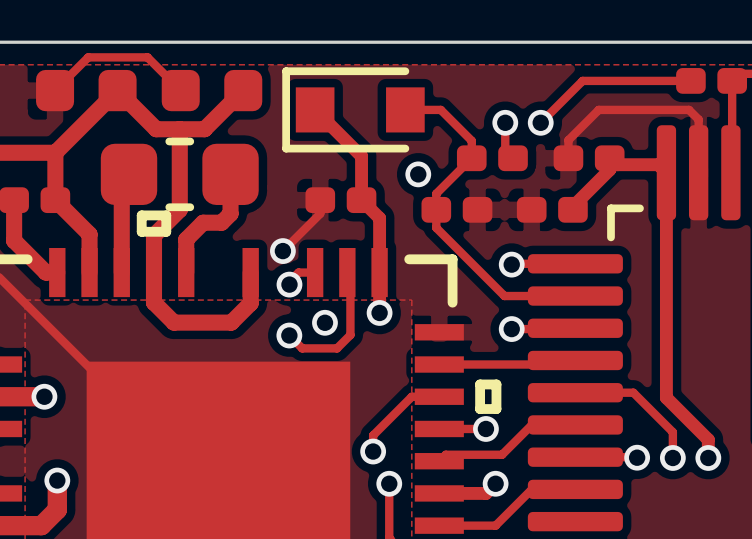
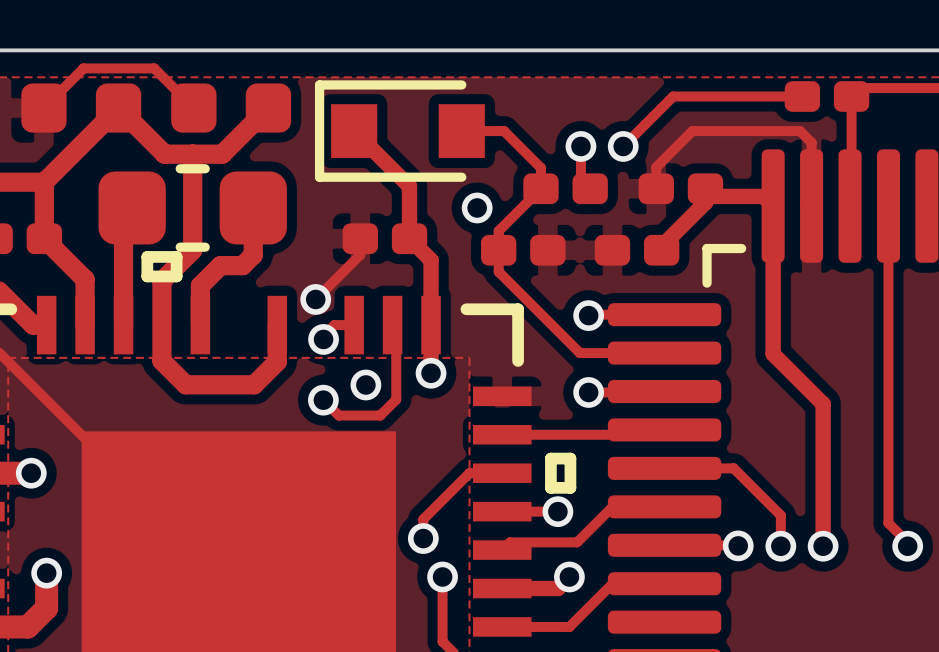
track: (666, 296) (666, 397) (708, 439) -> (773, 354) (823, 404) (823, 524)

